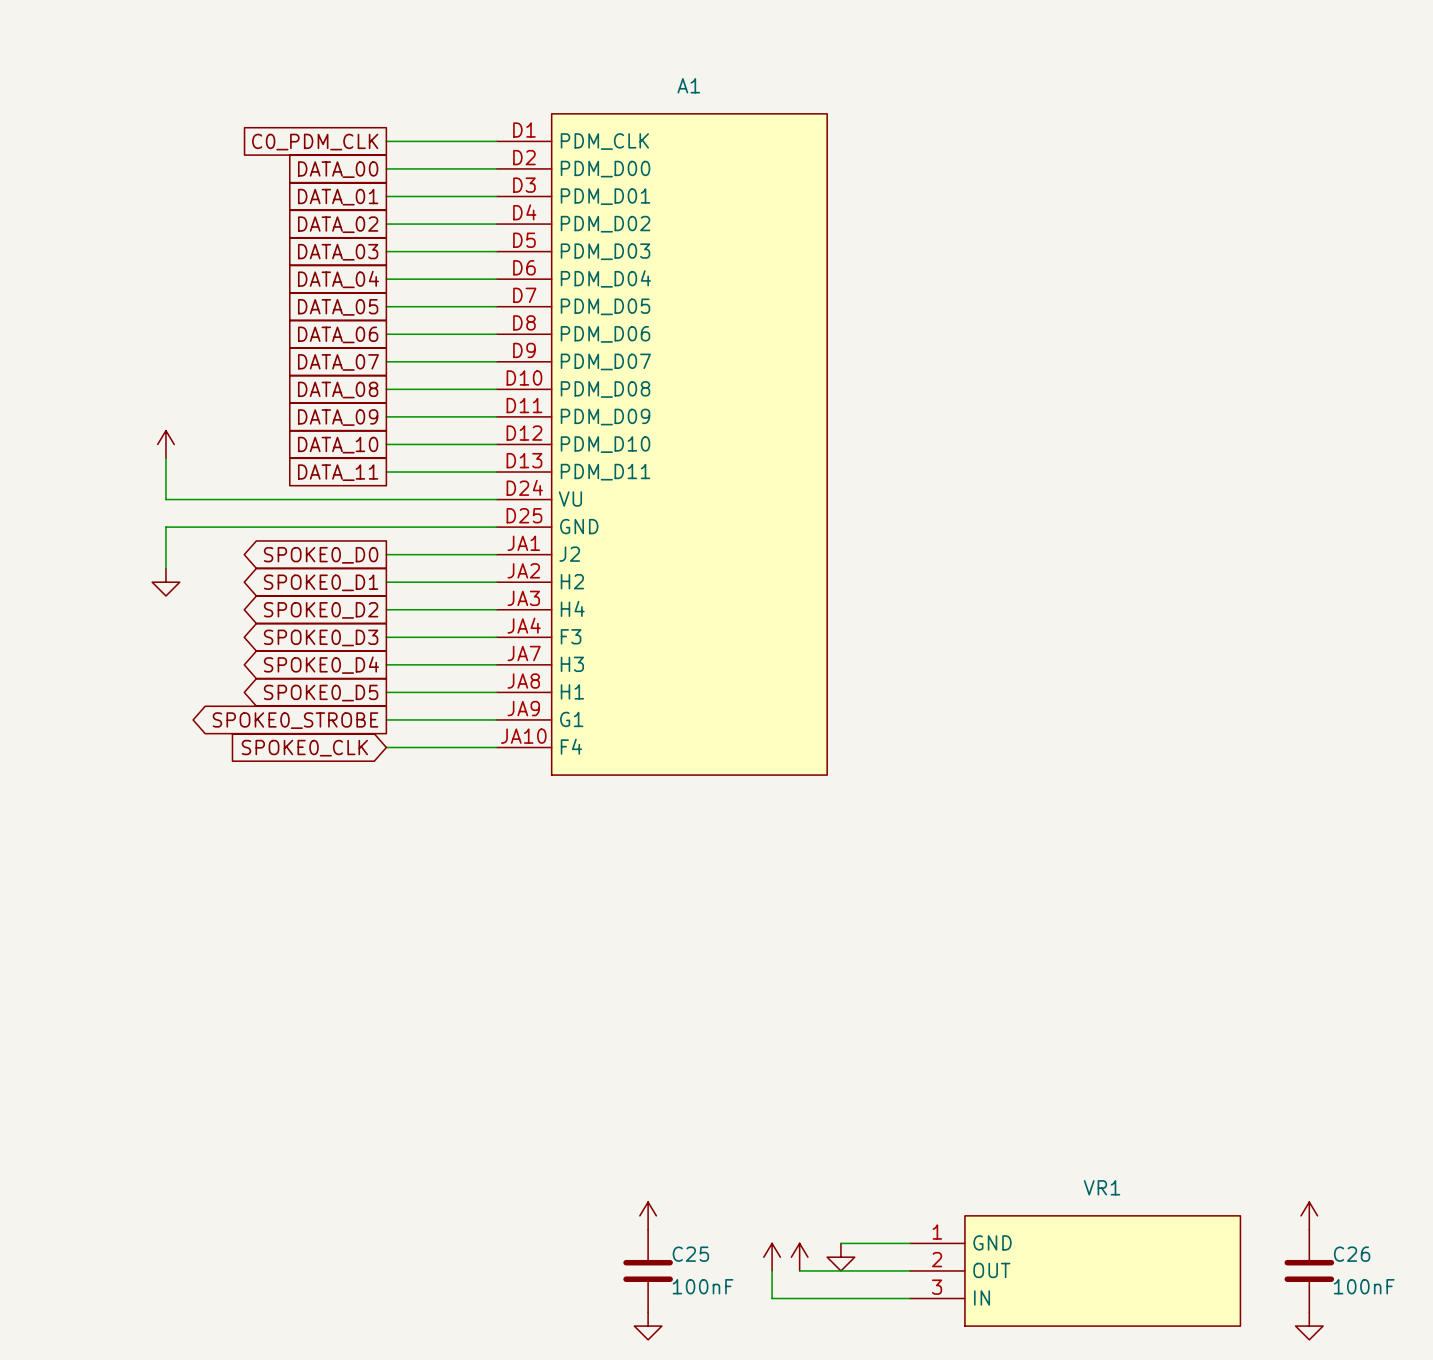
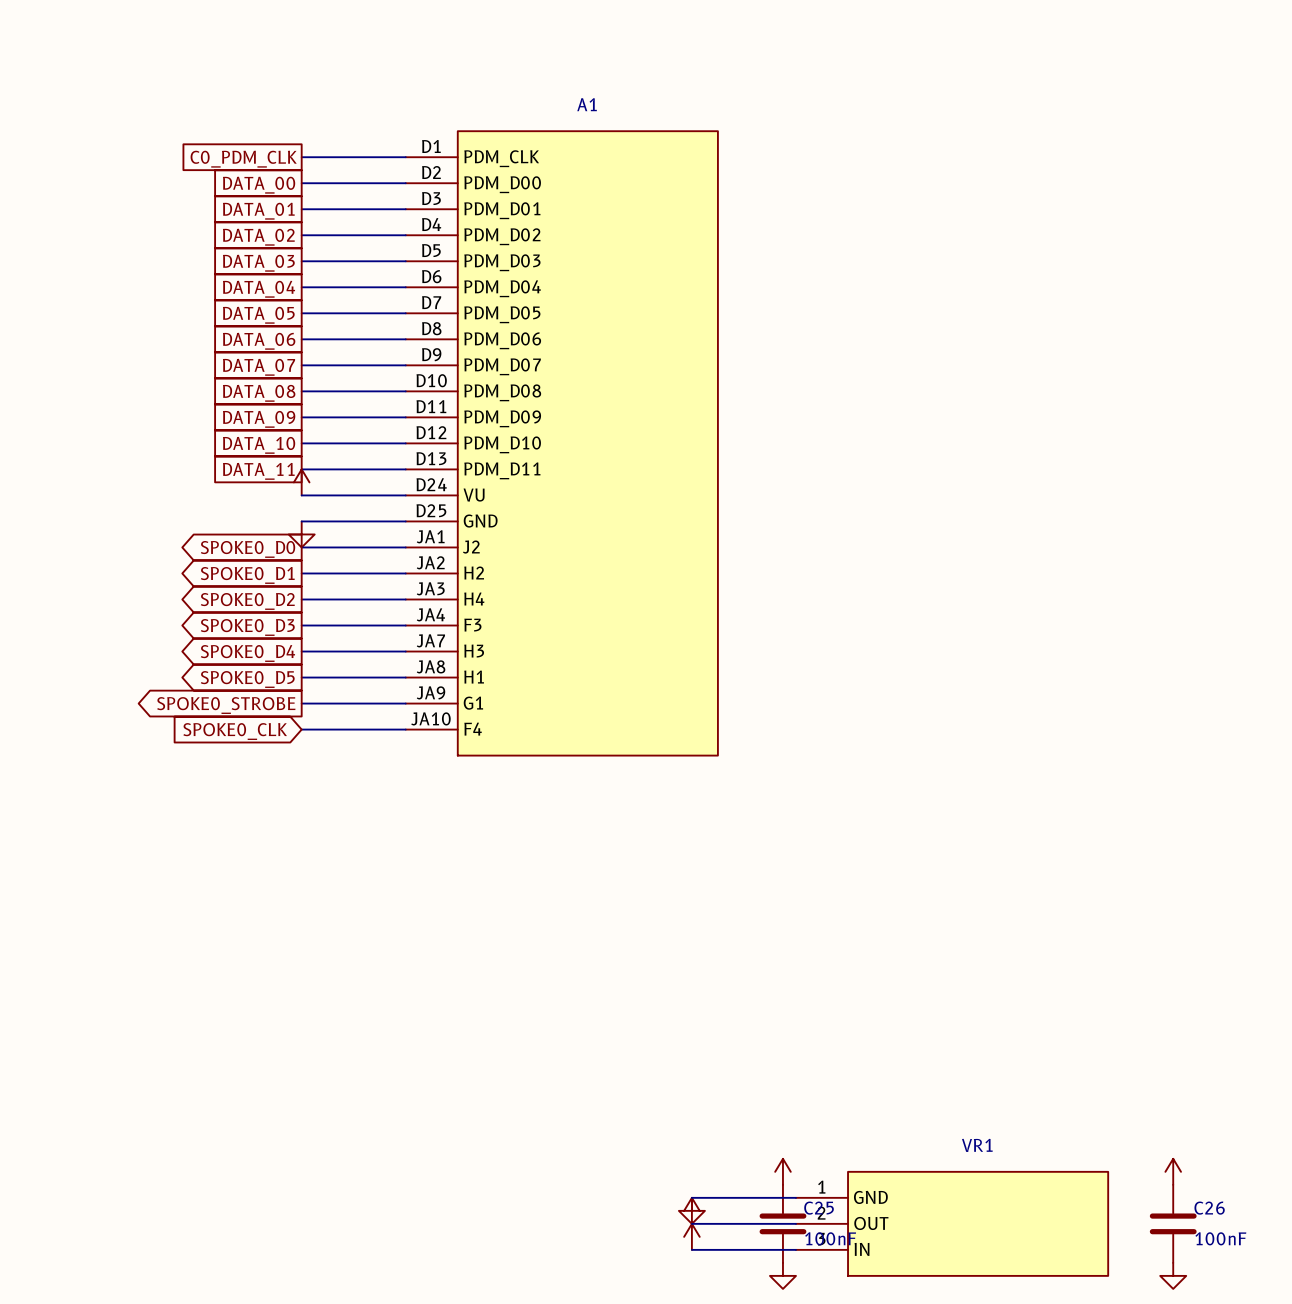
power symbol position: (165, 444) -> (301, 482)
wire: (165, 458) (165, 499) (386, 499) -> none
wire: (386, 527) (165, 527) (165, 568) -> none
power symbol position: (165, 582) -> (301, 534)
power symbol: (648, 1215) -> none
power symbol: none -> (782, 1171)
wire: none -> (691, 1197) (730, 1197)
power symbol position: (772, 1257) -> (691, 1236)
power symbol position: (840, 1257) -> (691, 1210)
C25 position: (648, 1270) -> (782, 1223)
wire: (772, 1270) (772, 1298) (799, 1298) -> none
power symbol: (648, 1326) -> none
power symbol: none -> (782, 1275)

